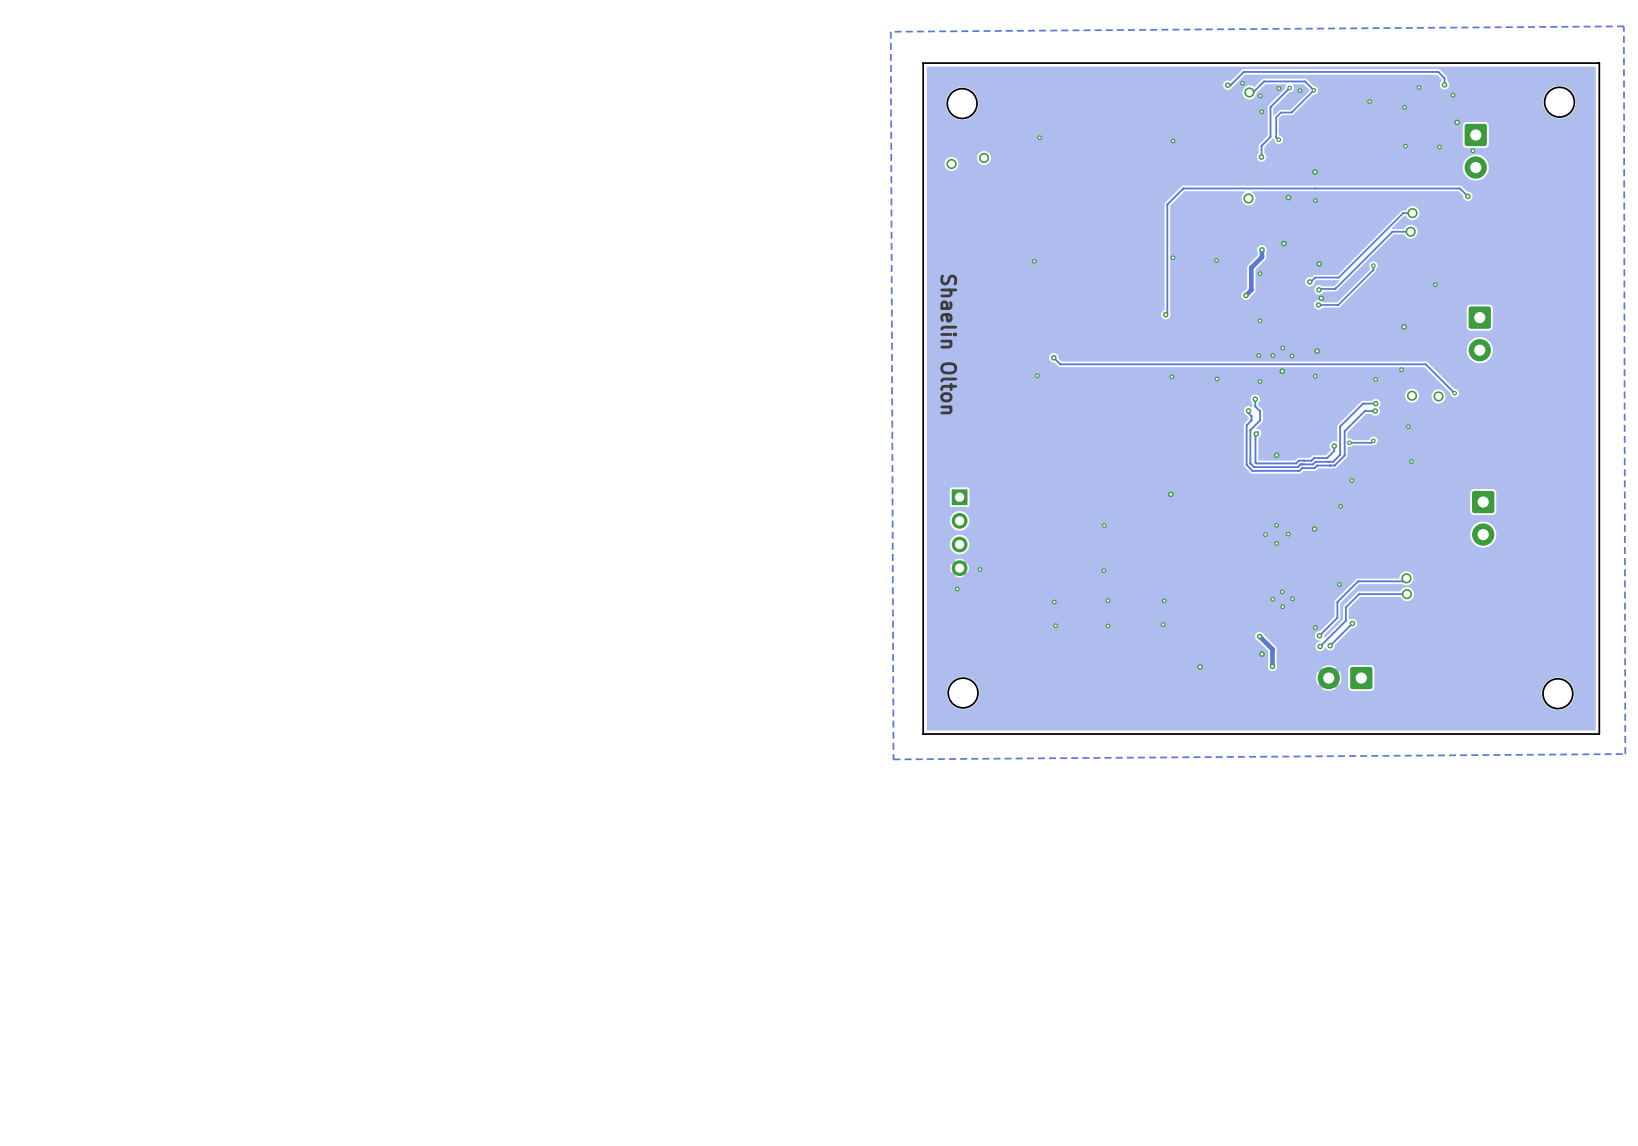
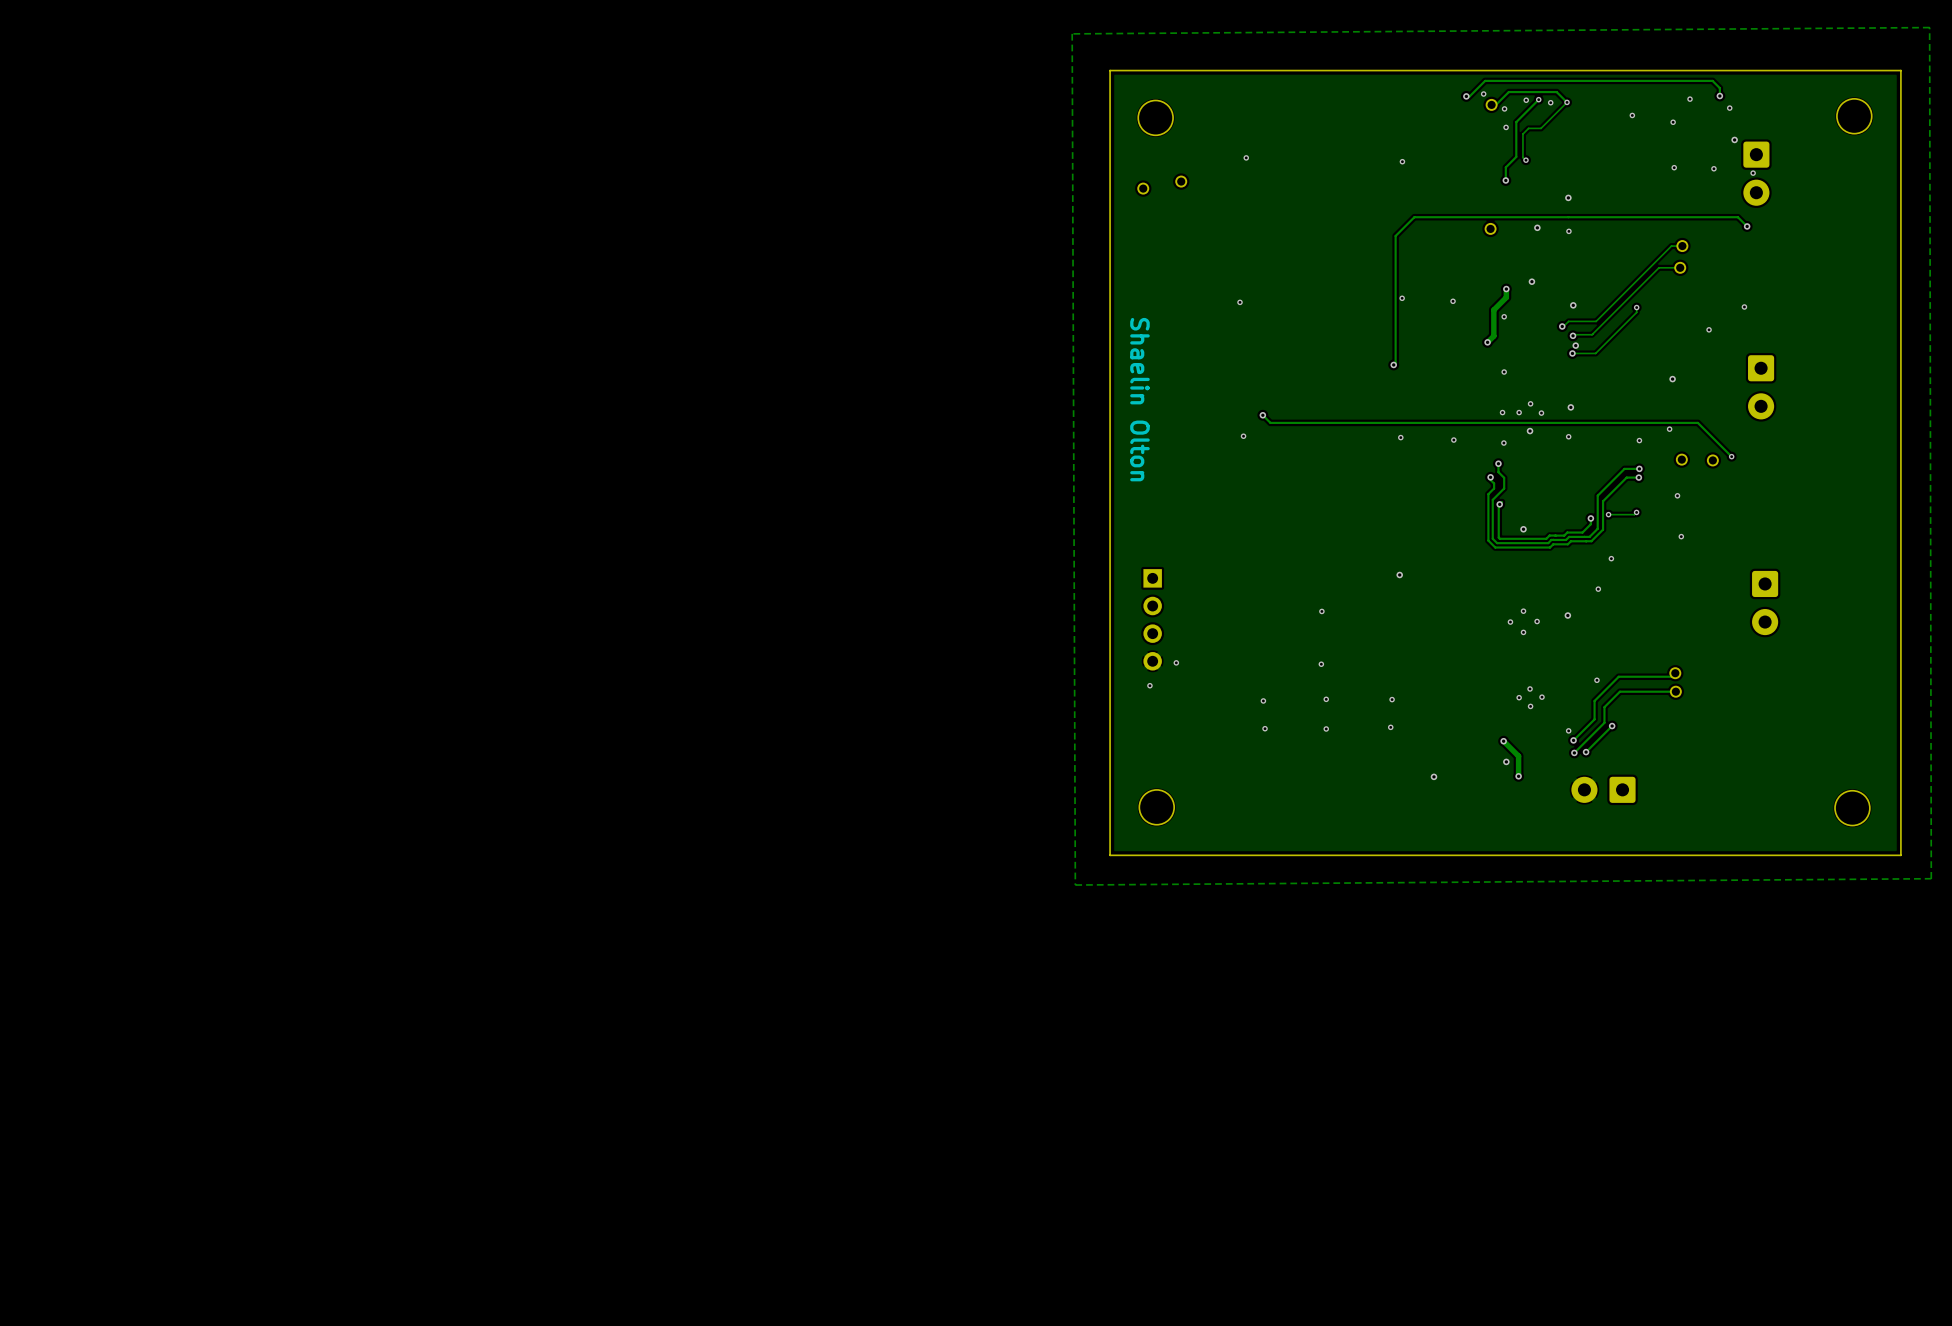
via: none -> (1744, 306)

